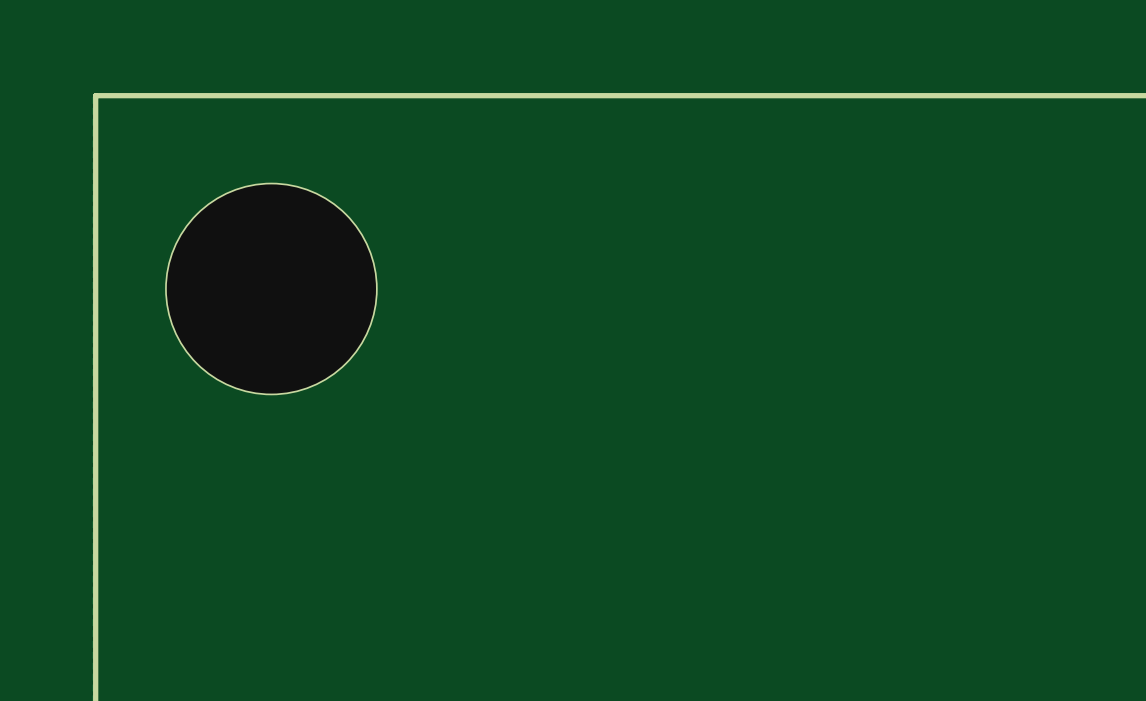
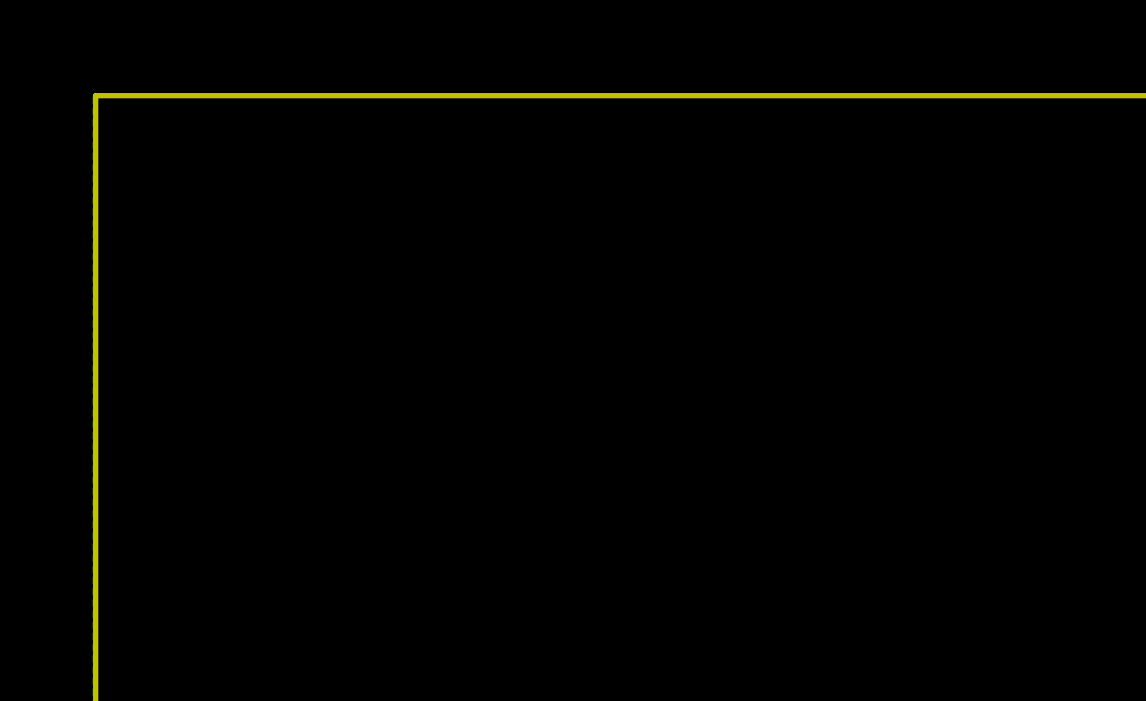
part: (271, 288) -> none

